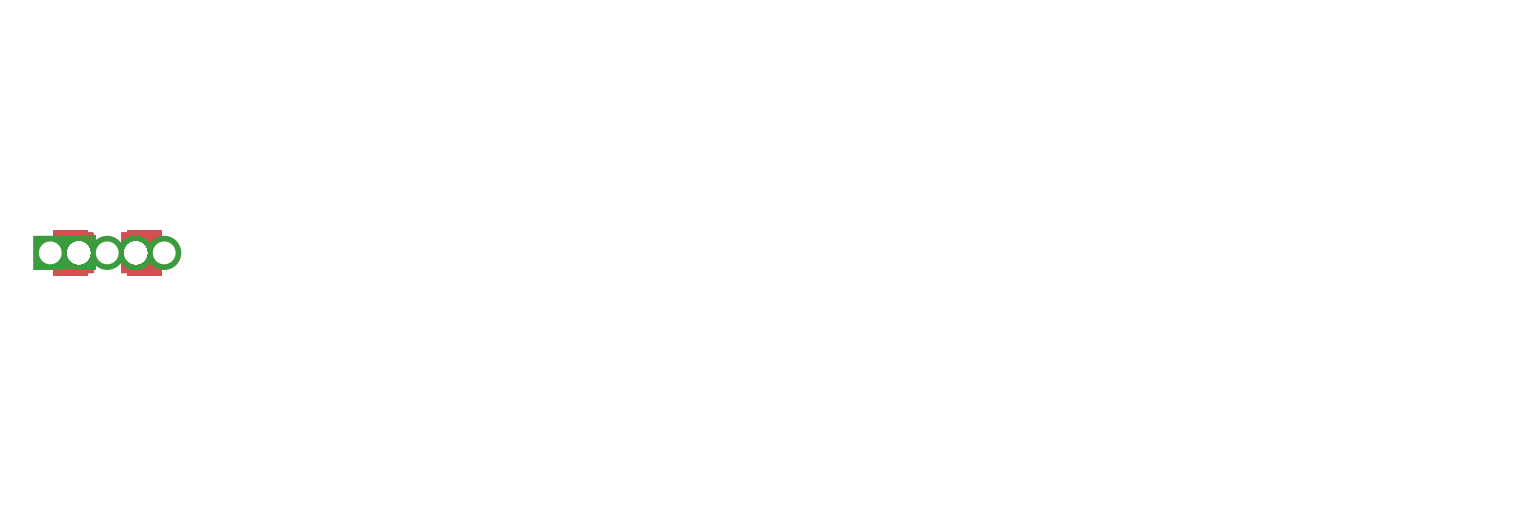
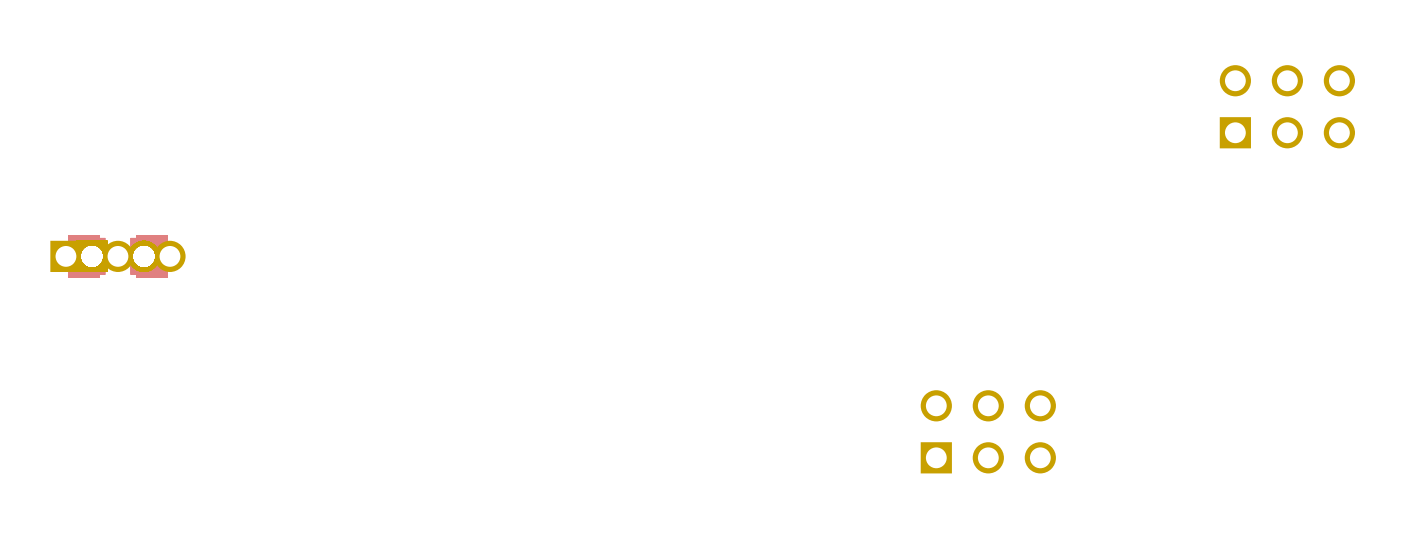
part: none -> (1287, 106)
part: none -> (988, 431)

